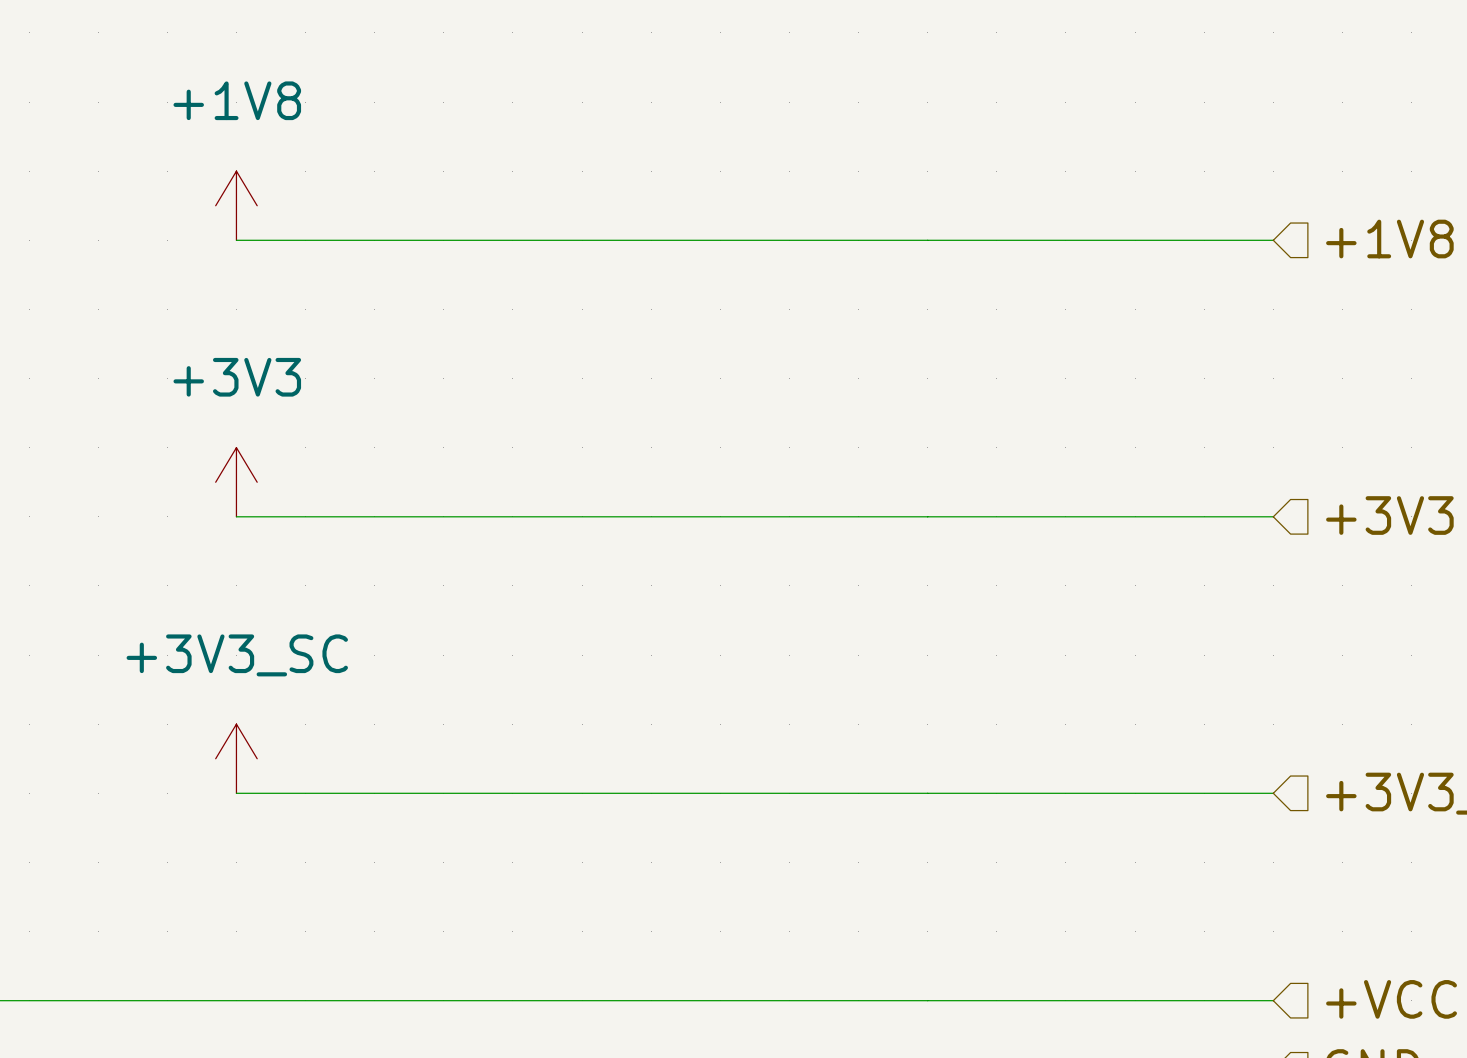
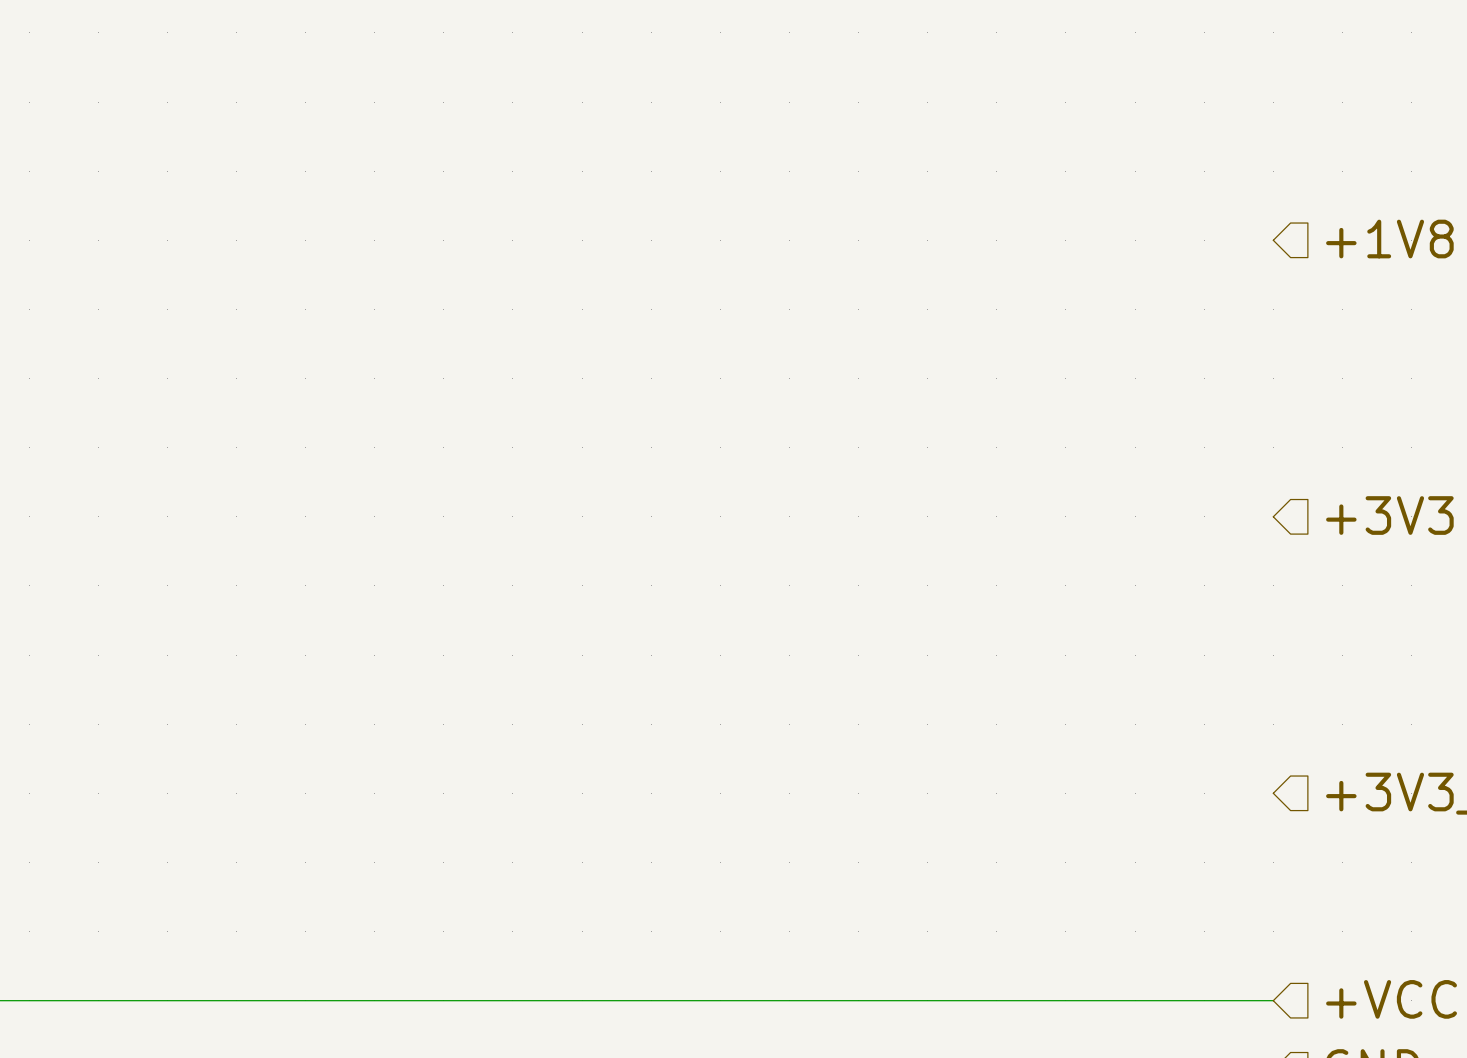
power symbol: +1V8 (236, 205) -> none
wire: (236, 240) (1273, 240) -> none
power symbol: +3V3 (236, 482) -> none
wire: (236, 516) (1273, 516) -> none
power symbol: +3V3_SC (236, 758) -> none
wire: (236, 793) (1273, 793) -> none

